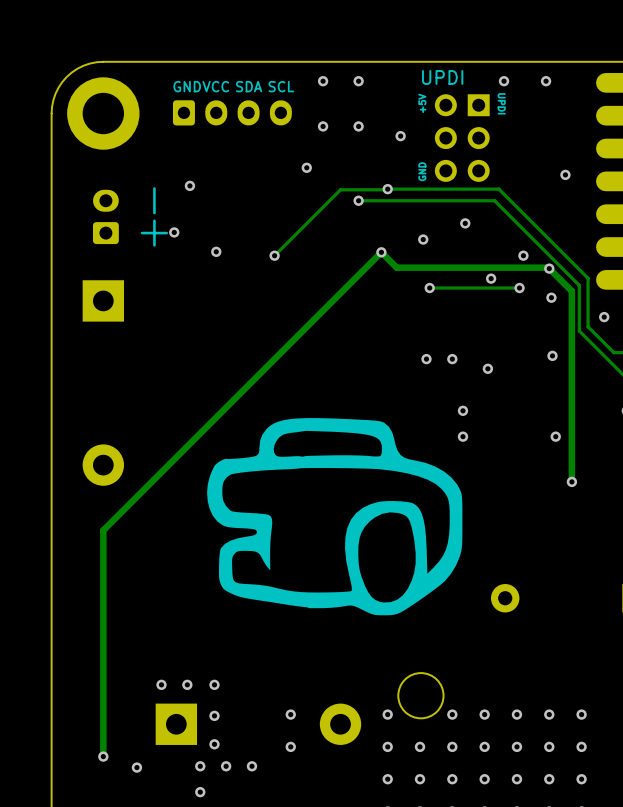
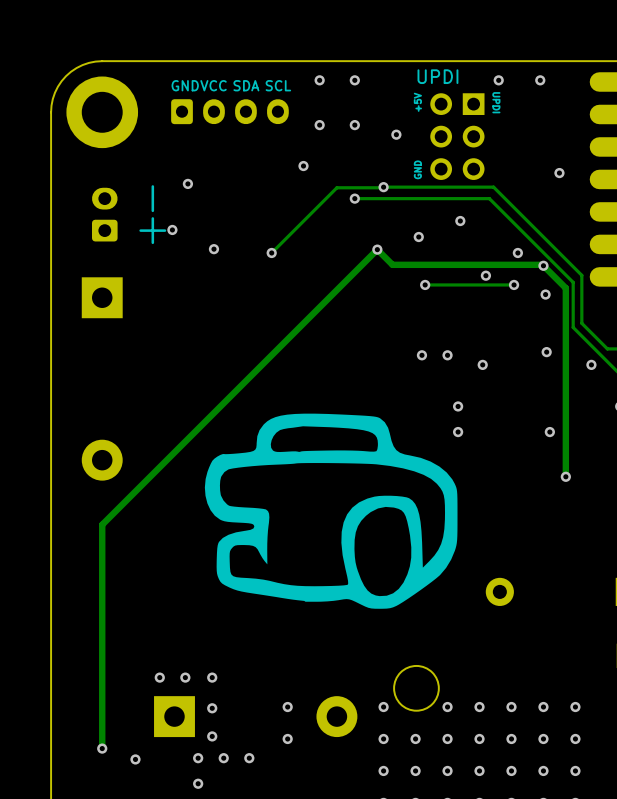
via position: (604, 317) -> (591, 364)

